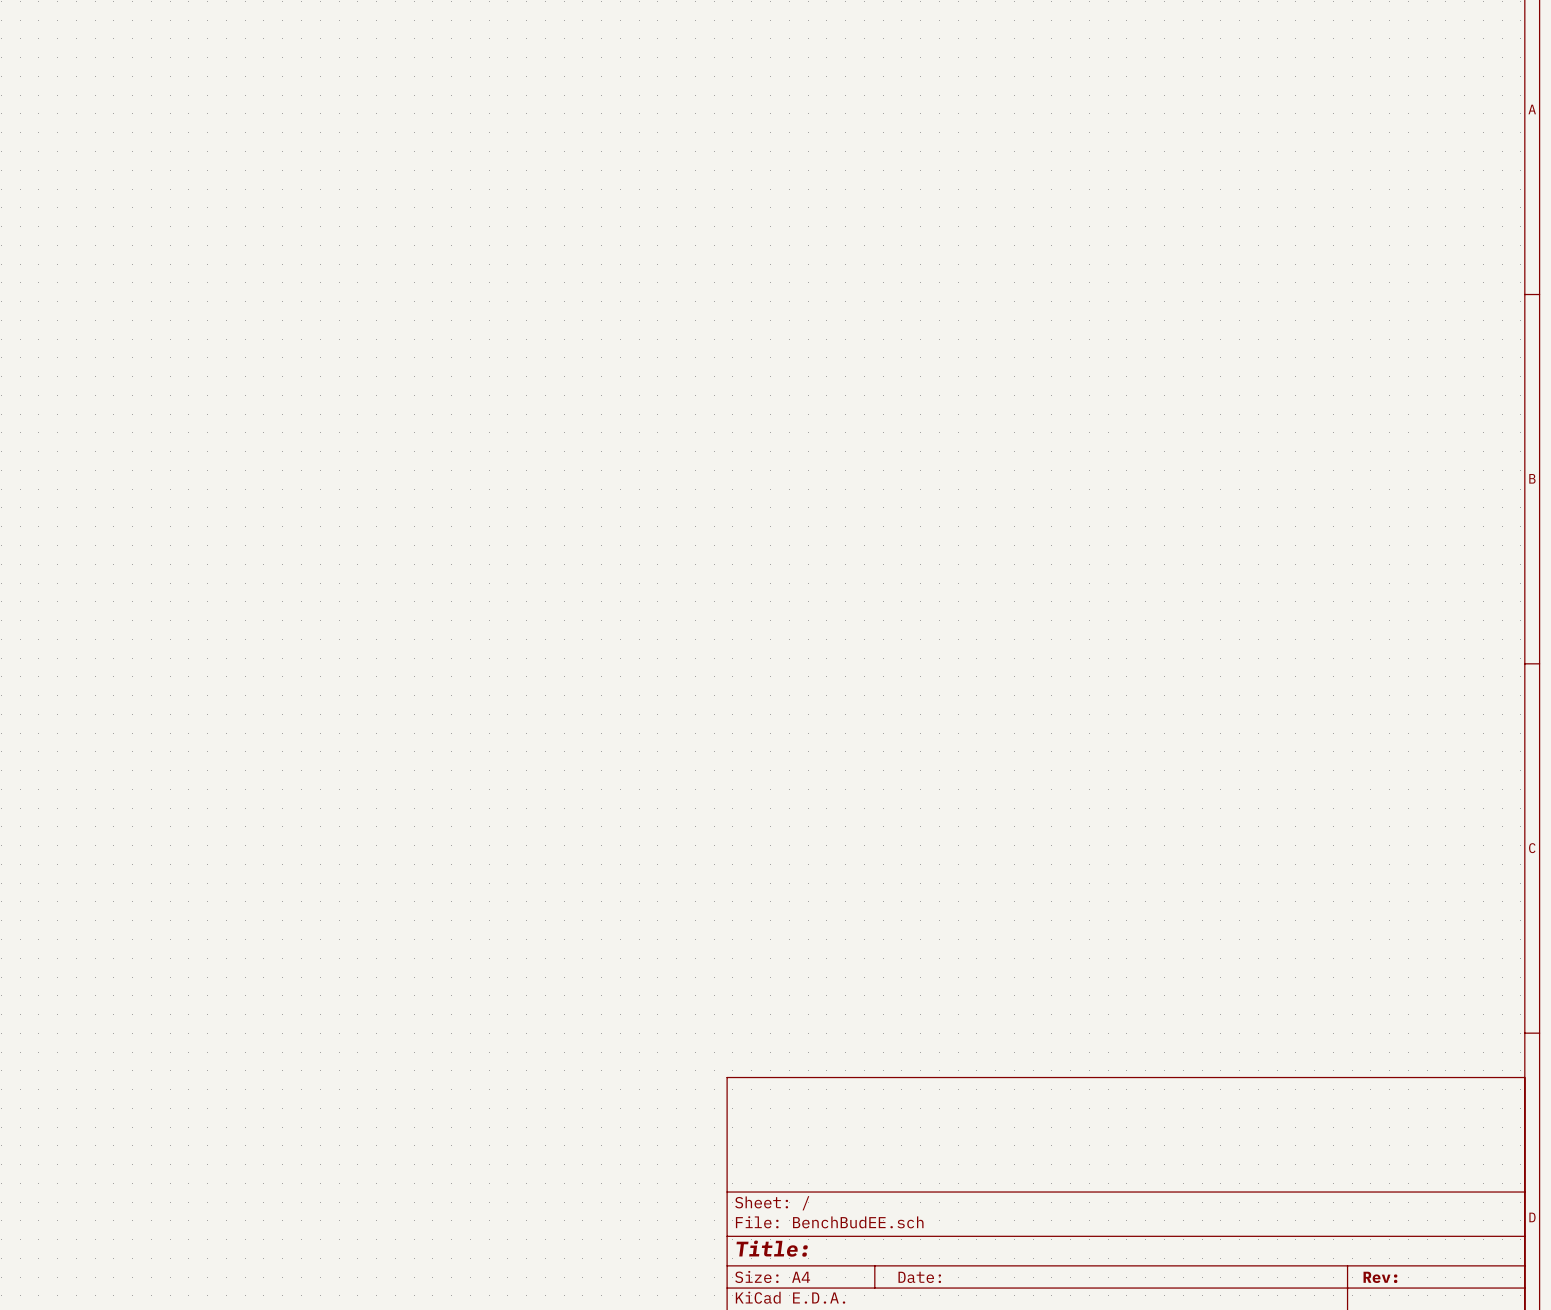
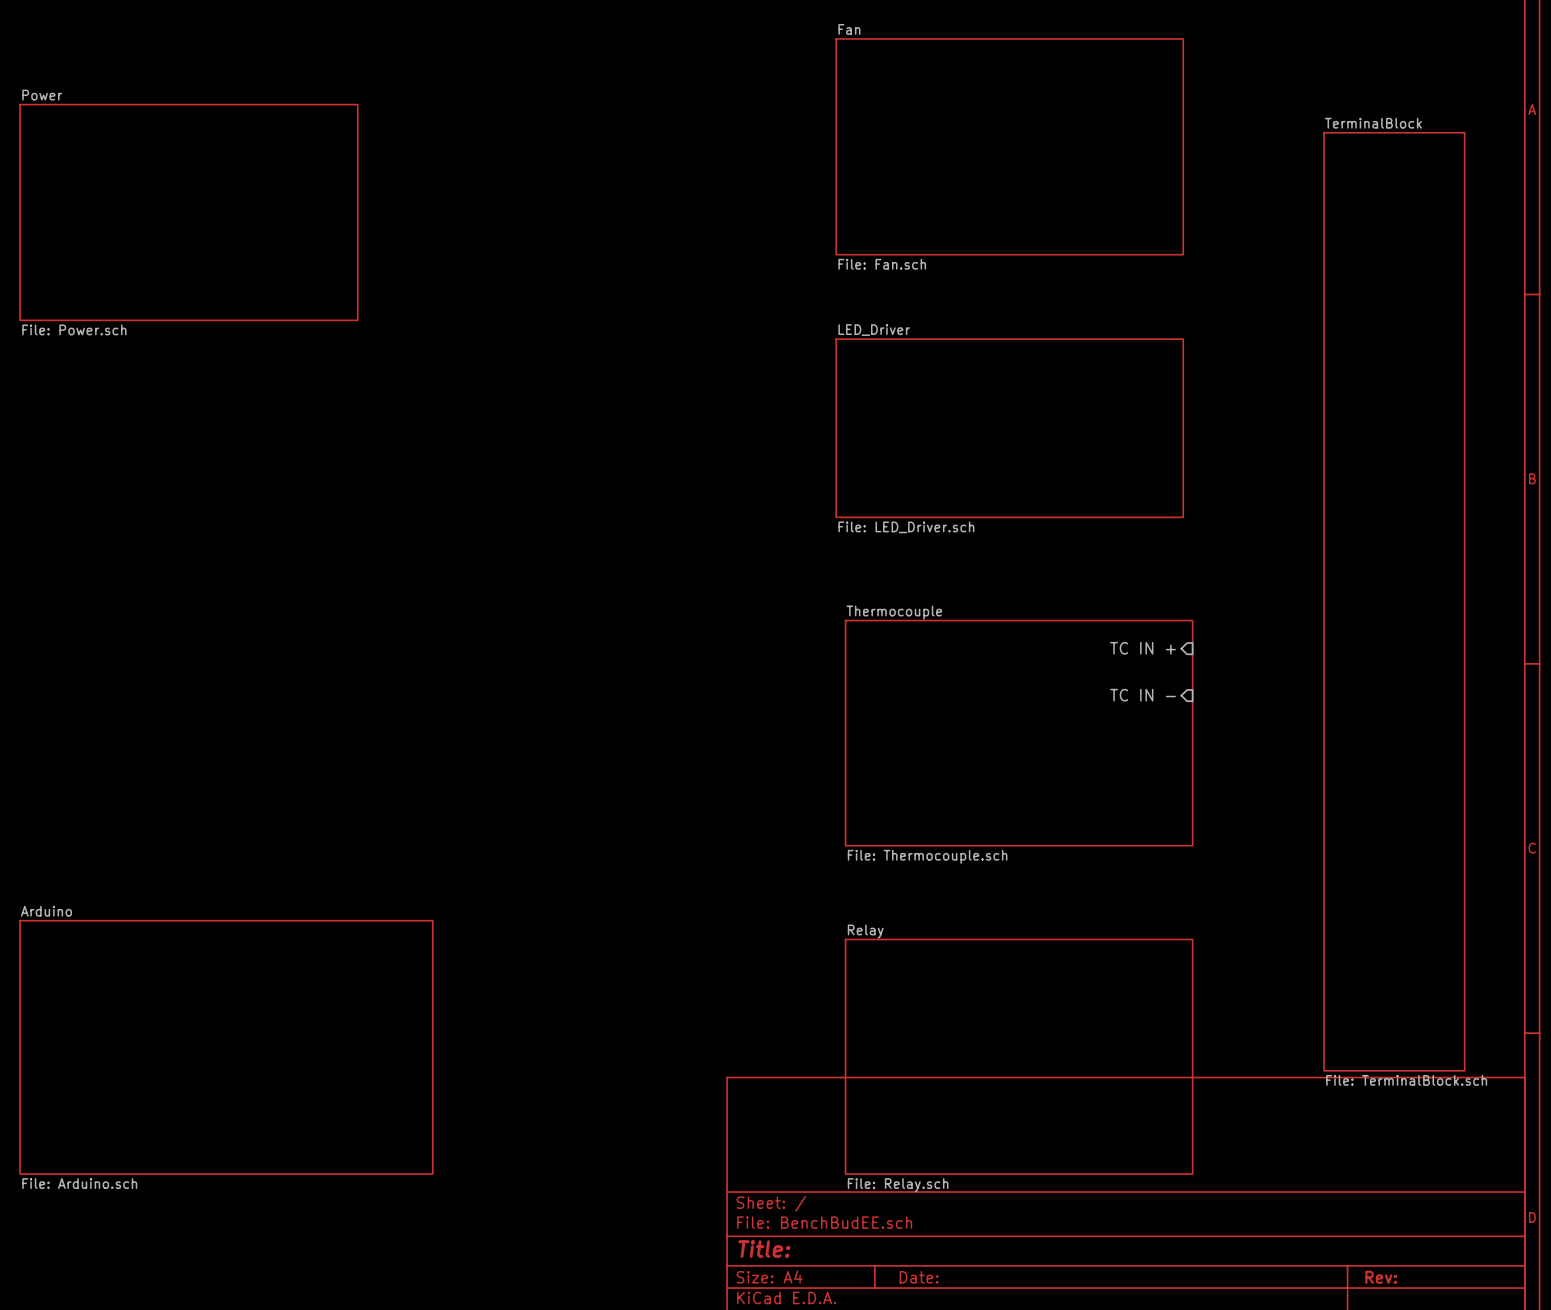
sheet Fan: none -> File: Fan.sch (1009, 146)
sheet Power: none -> File: Power.sch (188, 212)
sheet LED_Driver: none -> File: LED_Driver.sch (1009, 428)
sheet TerminalBlock: none -> File: TerminalBlock.sch (1394, 601)
sheet pin: none -> TC IN + (1142, 648)
sheet pin: none -> TC IN - (1142, 695)
sheet Thermocouple: none -> File: Thermocouple.sch (1019, 733)
sheet Arduino: none -> File: Arduino.sch (226, 1047)
sheet Relay: none -> File: Relay.sch (1019, 1056)

